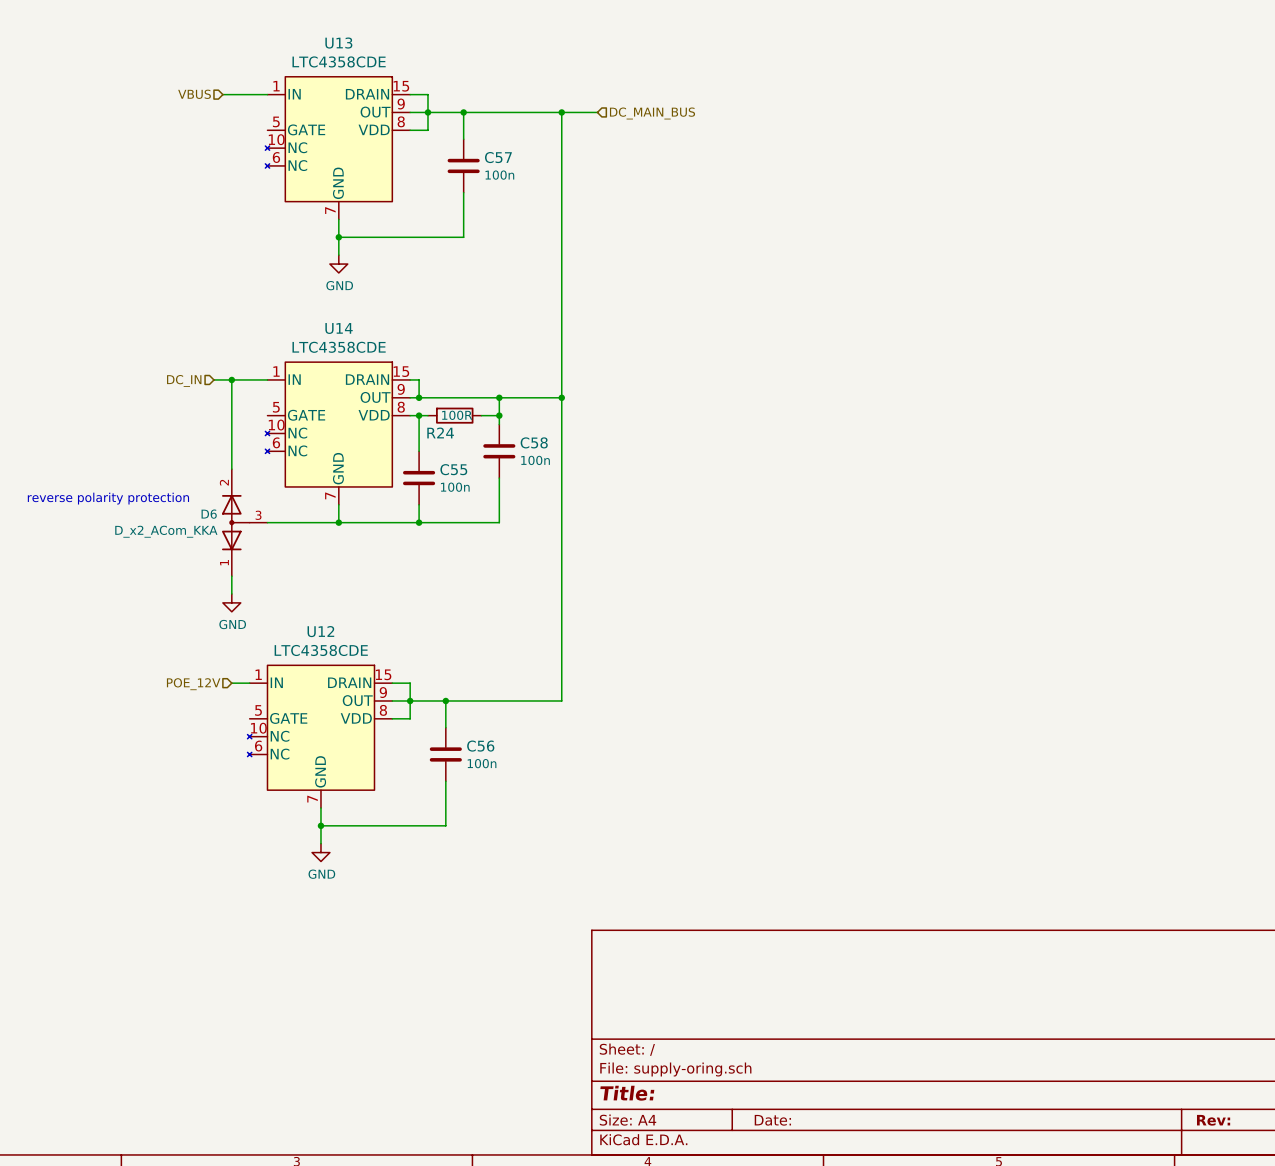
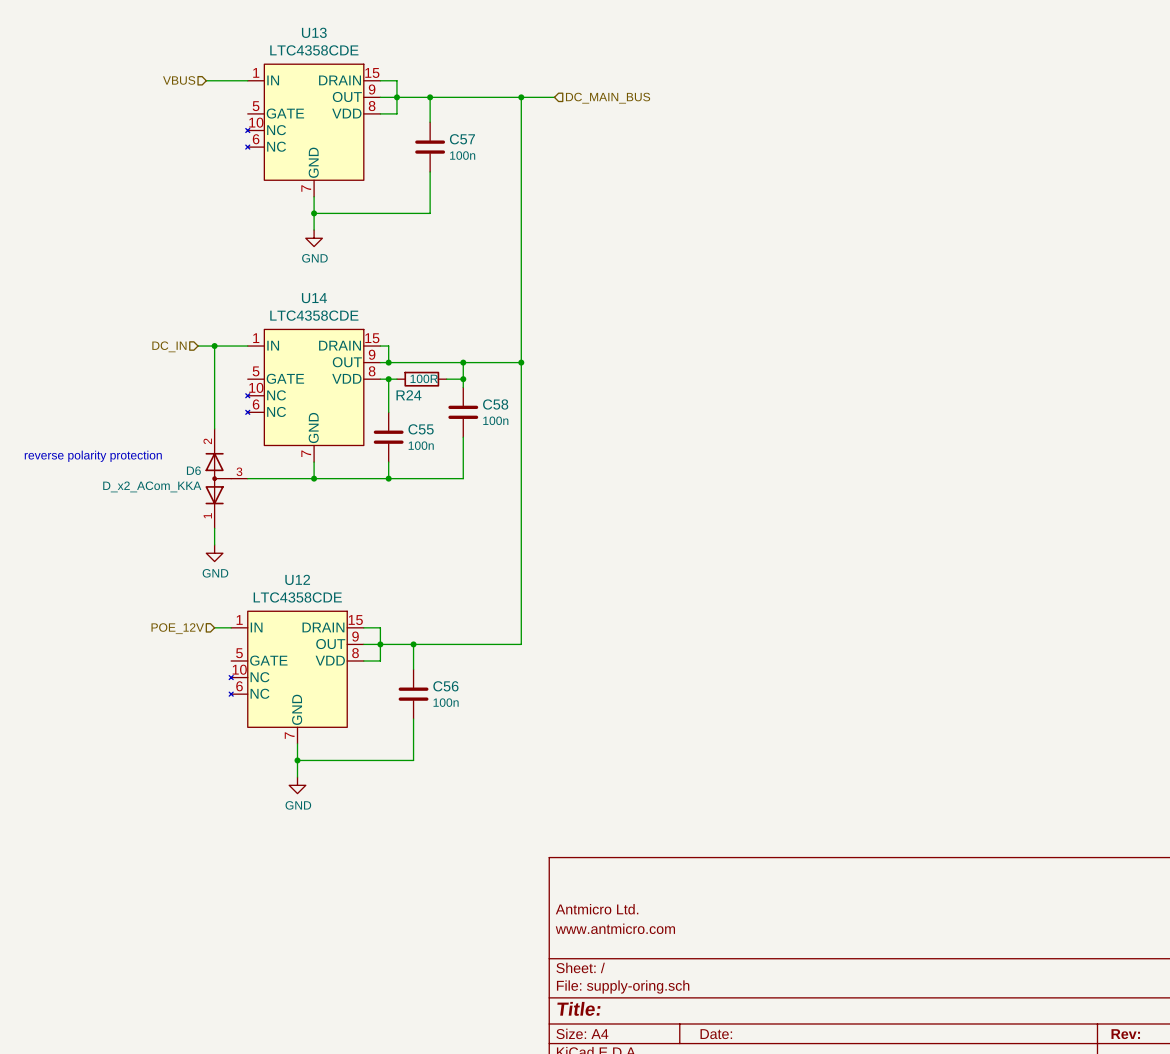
title block: none -> Antmicro Ltd. (597, 909)
title block: none -> www.antmicro.com (615, 928)

